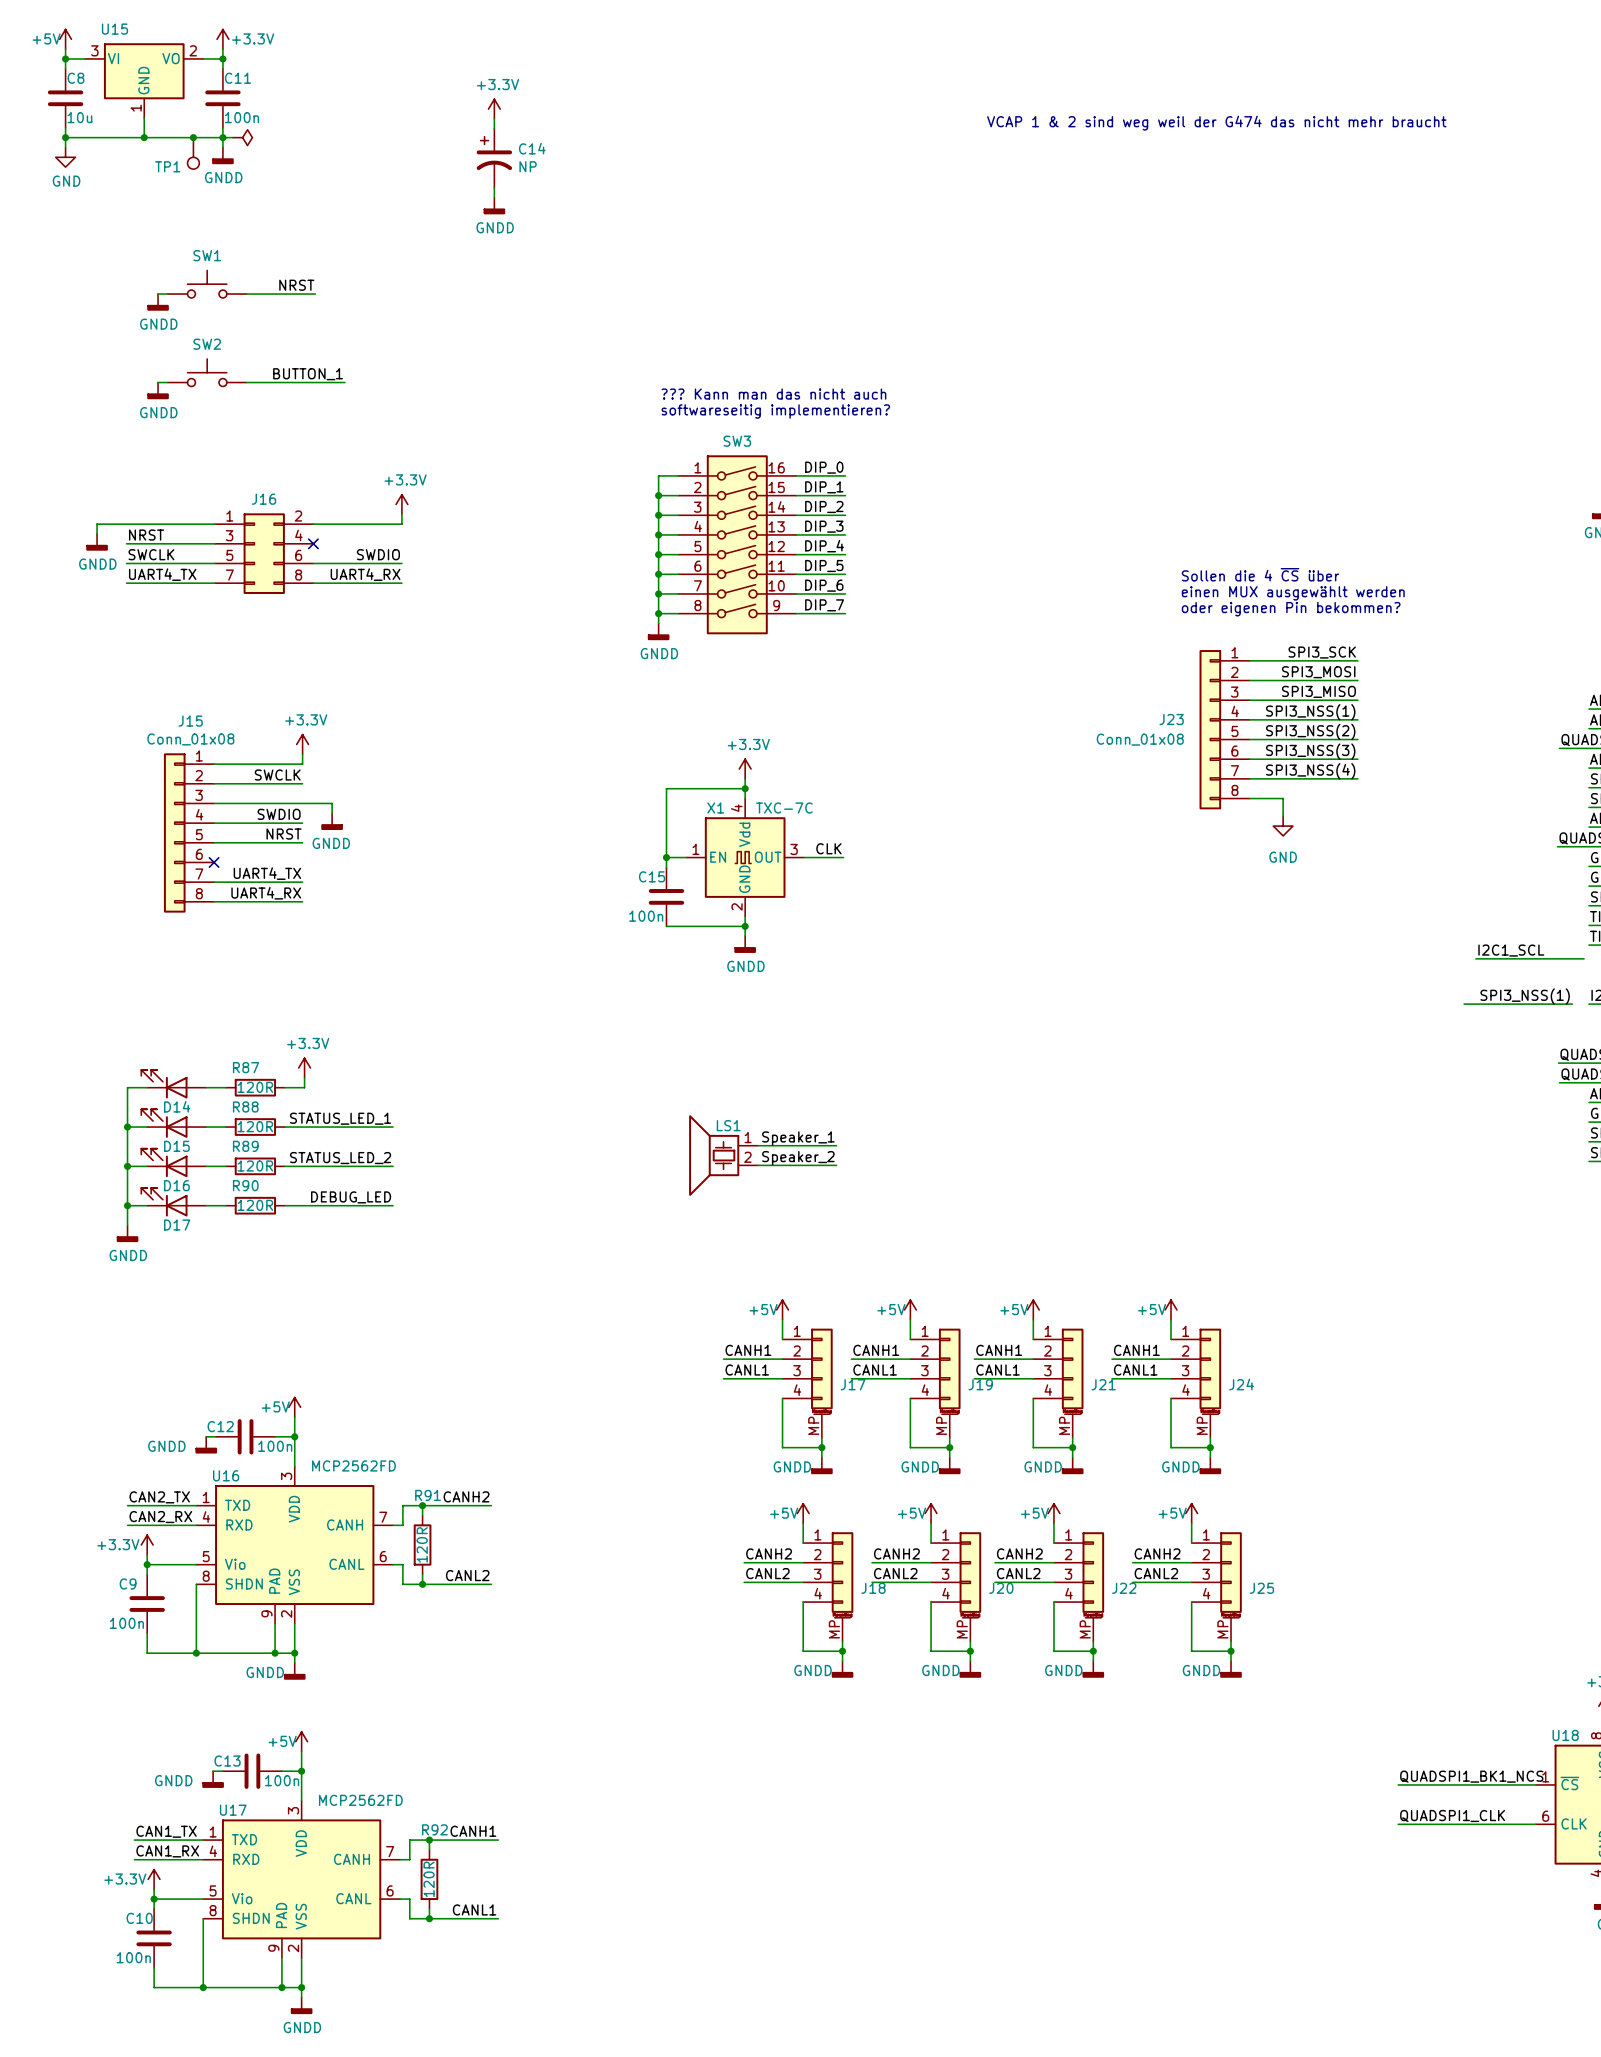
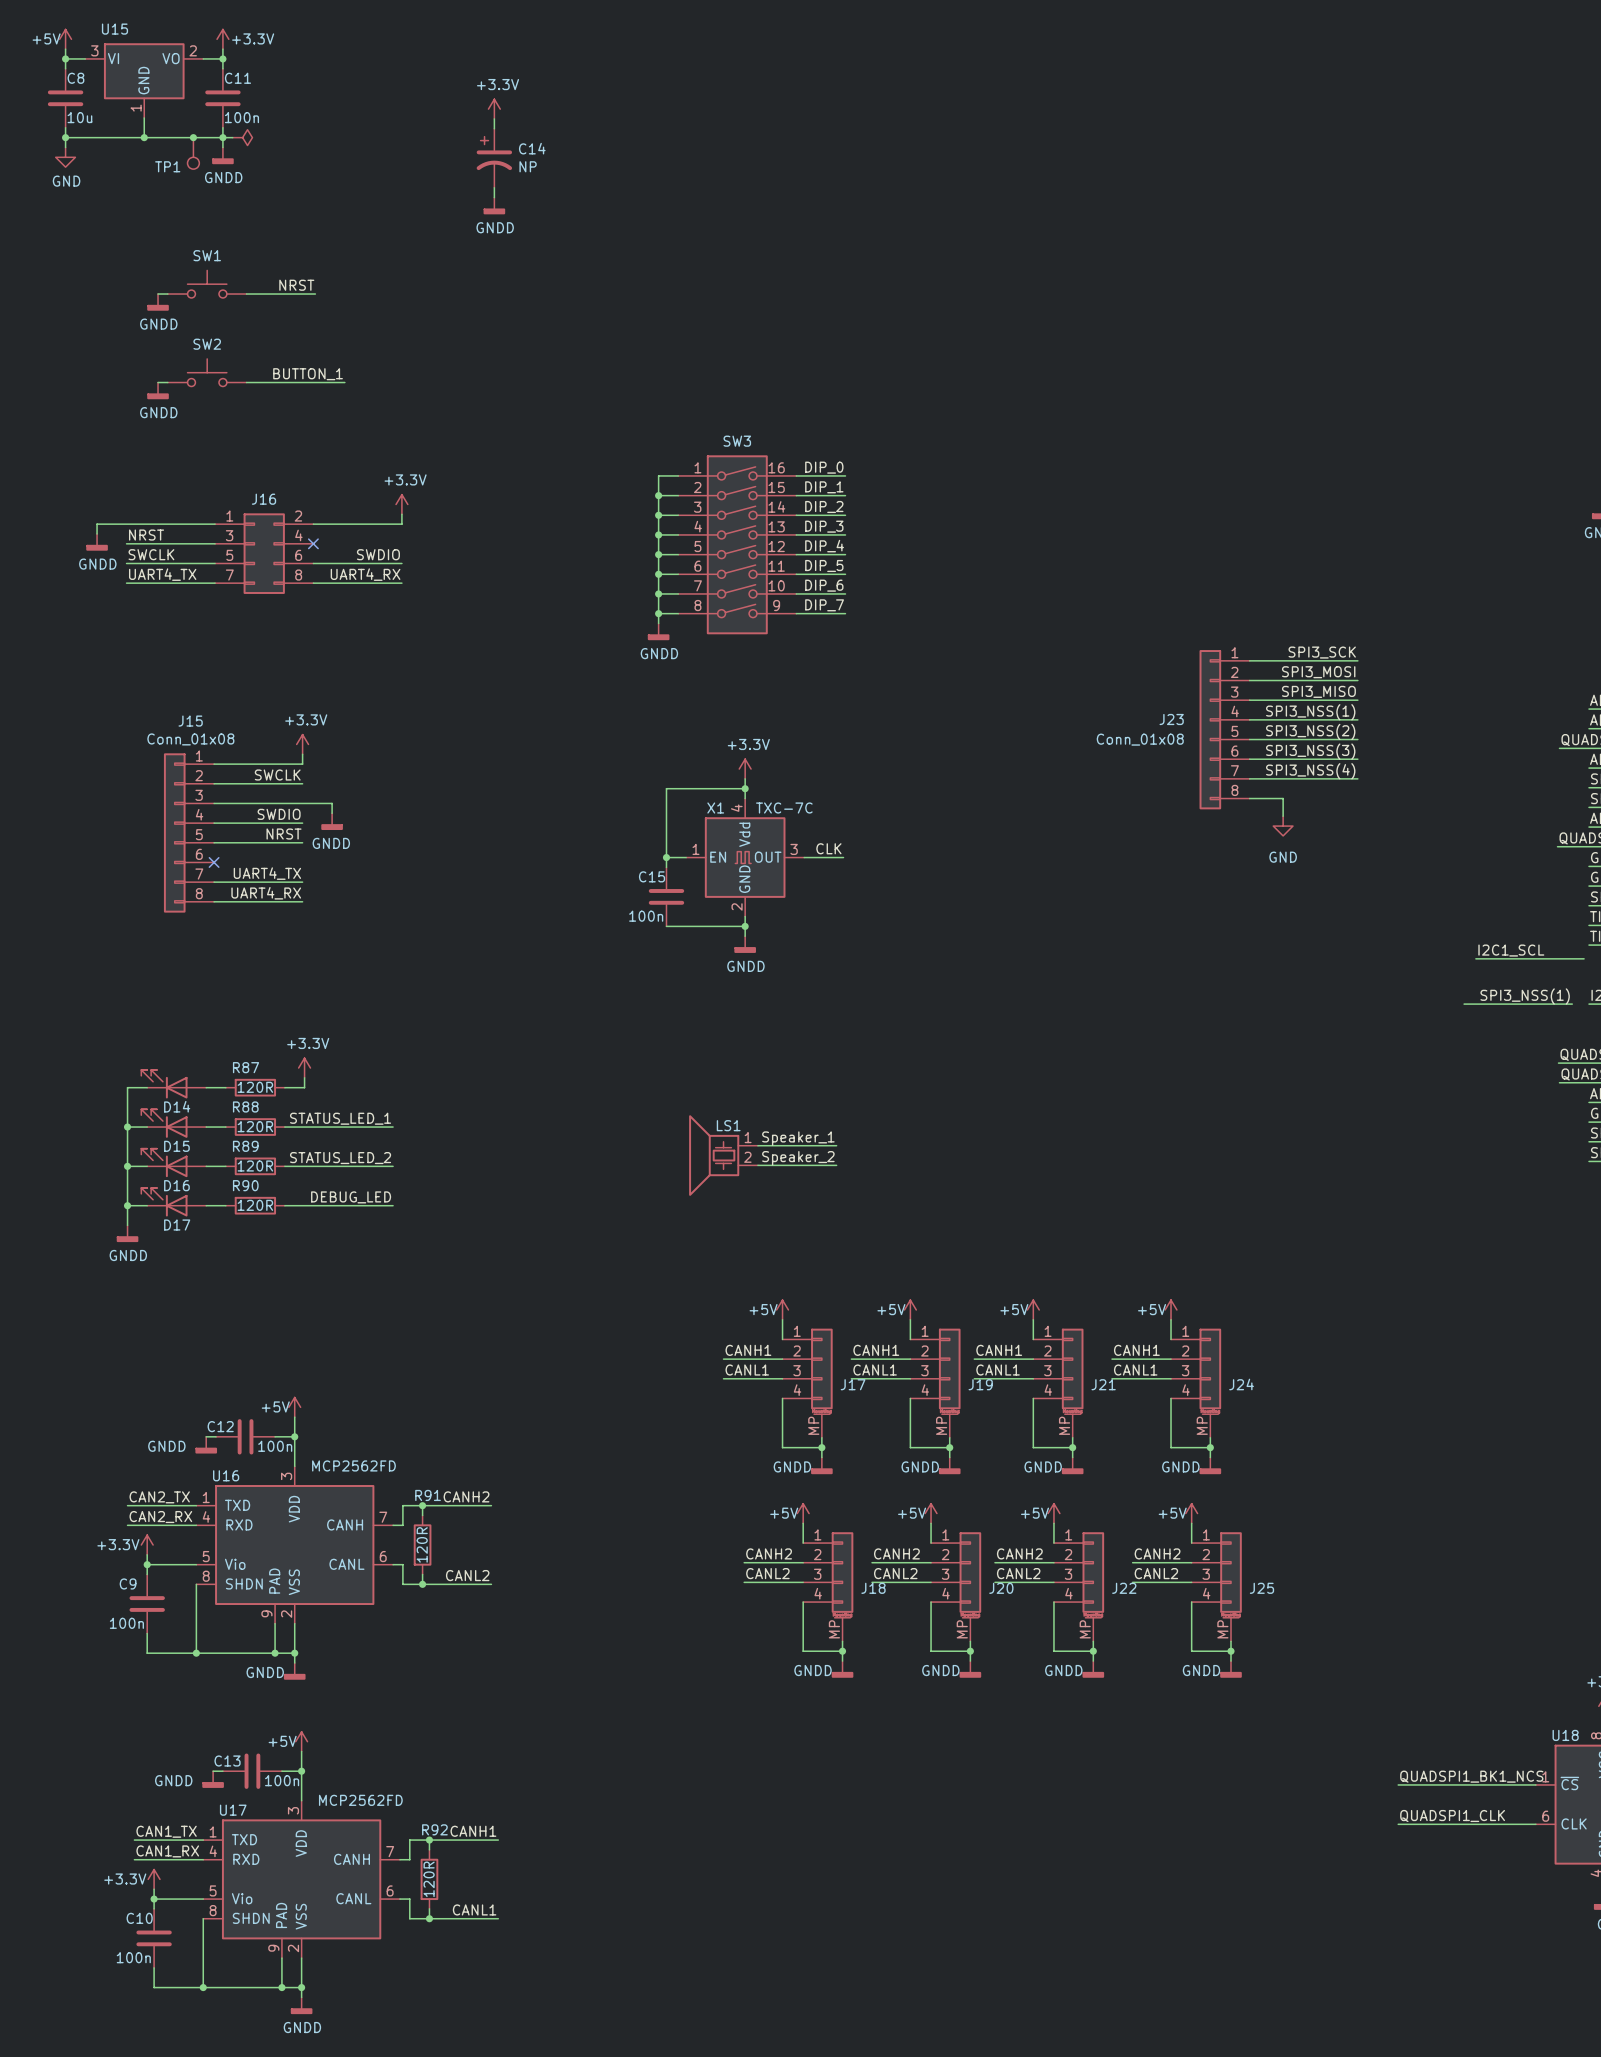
text: VCAP 1 & 2 sind weg weil der G474 das nicht mehr braucht (1216, 123) -> none
text: ??? Kann man das nicht auch (773, 394) -> none
text: softwareseitig implementieren? (775, 411) -> none
text: Sollen die 4 ~{CS} über (1260, 574) -> none
text: einen MUX ausgewählt werden (1293, 593) -> none
text: oder eigenen Pin bekommen? (1291, 609) -> none

